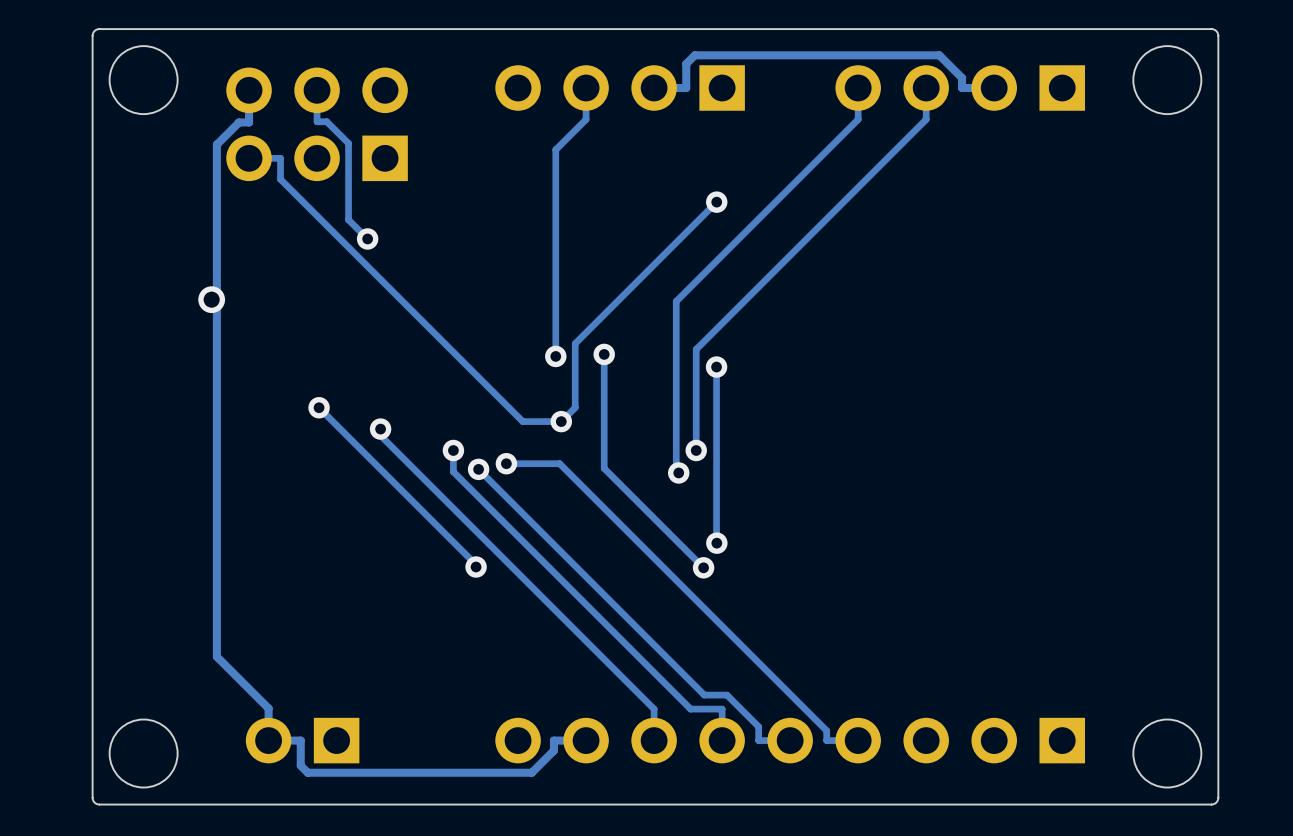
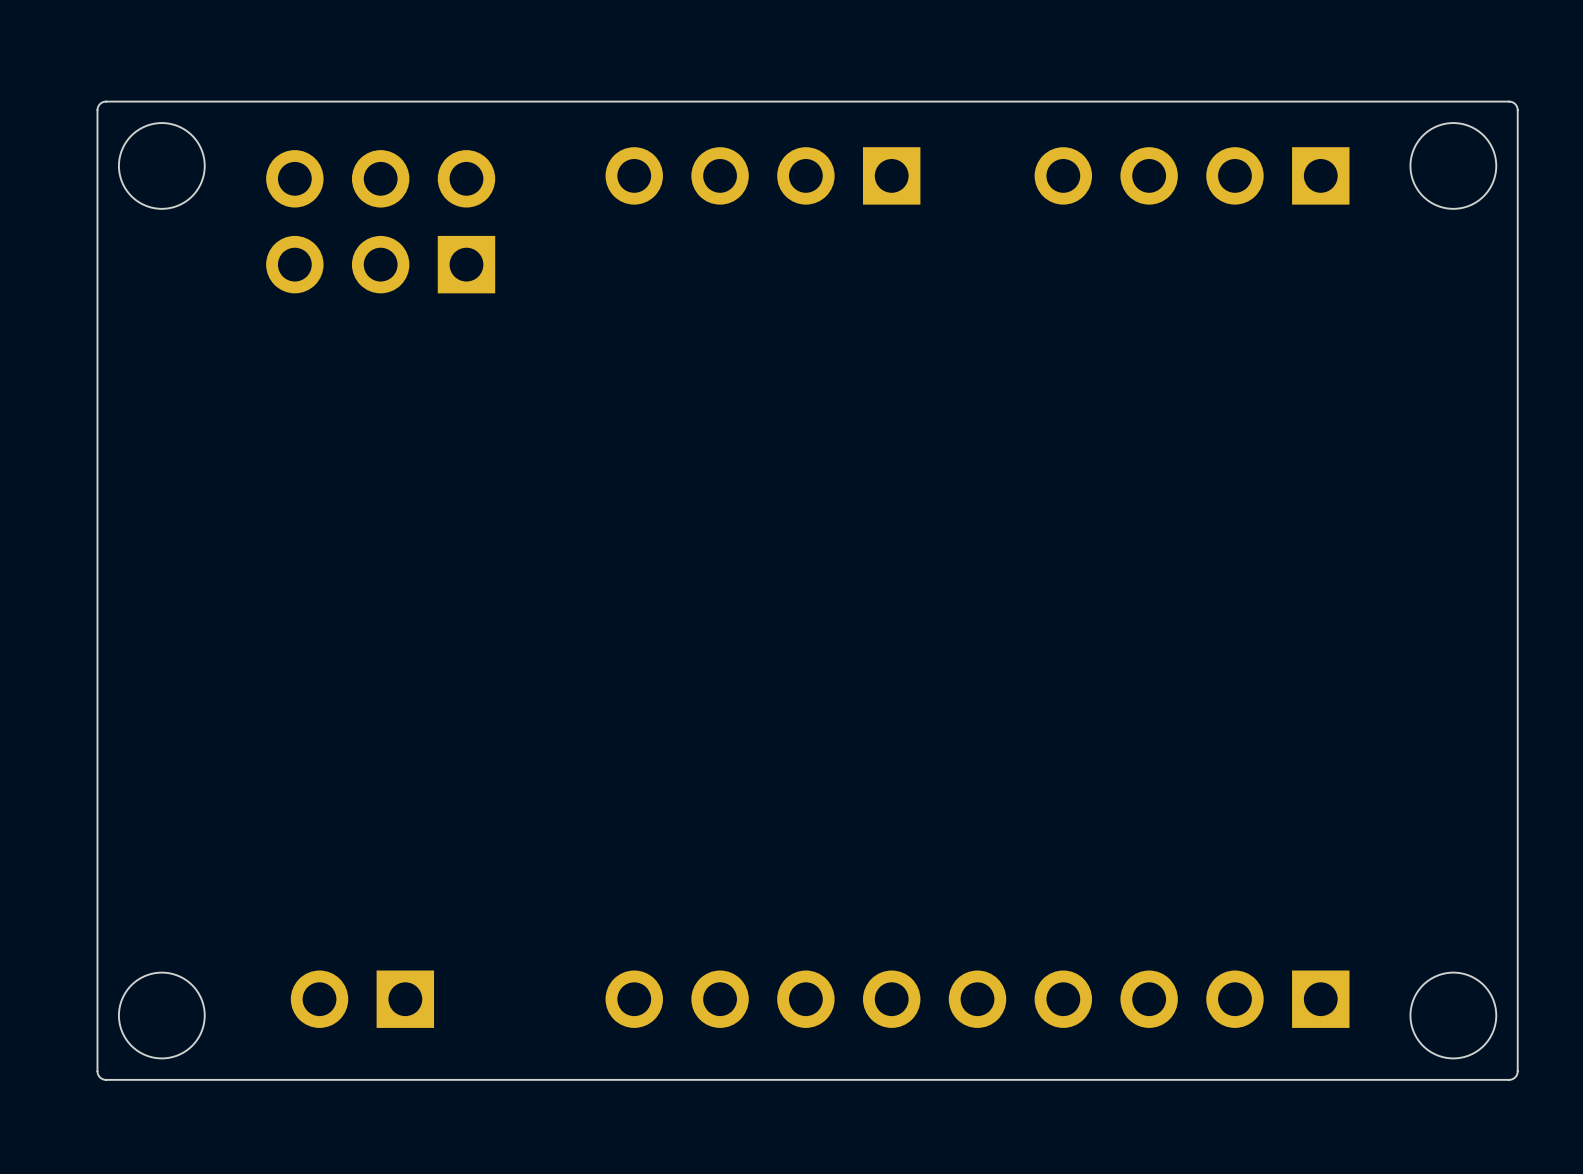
track: (586, 88) (586, 119) (555, 149) (555, 356) -> none
track: (858, 88) (858, 119) (676, 301) (676, 470) (678, 472) -> none
track: (926, 88) (926, 119) (696, 349) (696, 450) -> none
track: (994, 88) (962, 88) (962, 78) (939, 55) (694, 55) (686, 63) (686, 88) (654, 88) -> none
track: (249, 90) (249, 122) (239, 122) (216, 144) (216, 656) (268, 708) (268, 740) (300, 740) (300, 765) (307, 772) (531, 772) (553, 750) (553, 740) (586, 740) -> none
track: (317, 90) (317, 121) (326, 121) (348, 143) (348, 219) (367, 238) -> none
track: (249, 158) (280, 158) (280, 179) (522, 421) (561, 421) (575, 407) (575, 343) (716, 202) -> none
via: (716, 202) -> none
via: (367, 238) -> none
via: (211, 299) -> none
track: (604, 354) (604, 468) (703, 567) -> none
via: (604, 354) -> none
via: (555, 356) -> none
track: (716, 367) (716, 542) -> none
via: (716, 367) -> none
track: (319, 407) (476, 564) (476, 567) -> none
via: (319, 407) -> none
via: (561, 421) -> none
track: (380, 429) (380, 435) (654, 709) (654, 740) -> none
via: (380, 429) -> none
track: (453, 450) (453, 471) (690, 709) (722, 709) (722, 740) -> none
via: (453, 450) -> none
via: (696, 450) -> none
track: (506, 463) (559, 463) (826, 730) (826, 740) (858, 740) -> none
via: (506, 463) -> none
track: (478, 469) (704, 695) (726, 695) (758, 726) (758, 740) (790, 740) -> none
via: (478, 469) -> none
via: (678, 472) -> none
via: (716, 543) -> none
via: (476, 567) -> none
via: (703, 567) -> none

